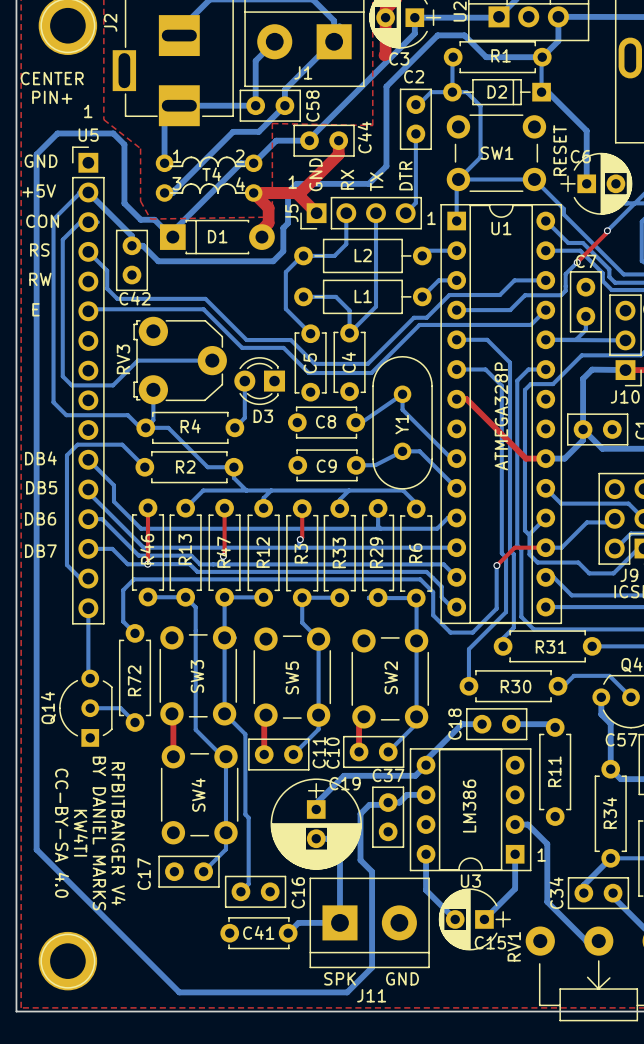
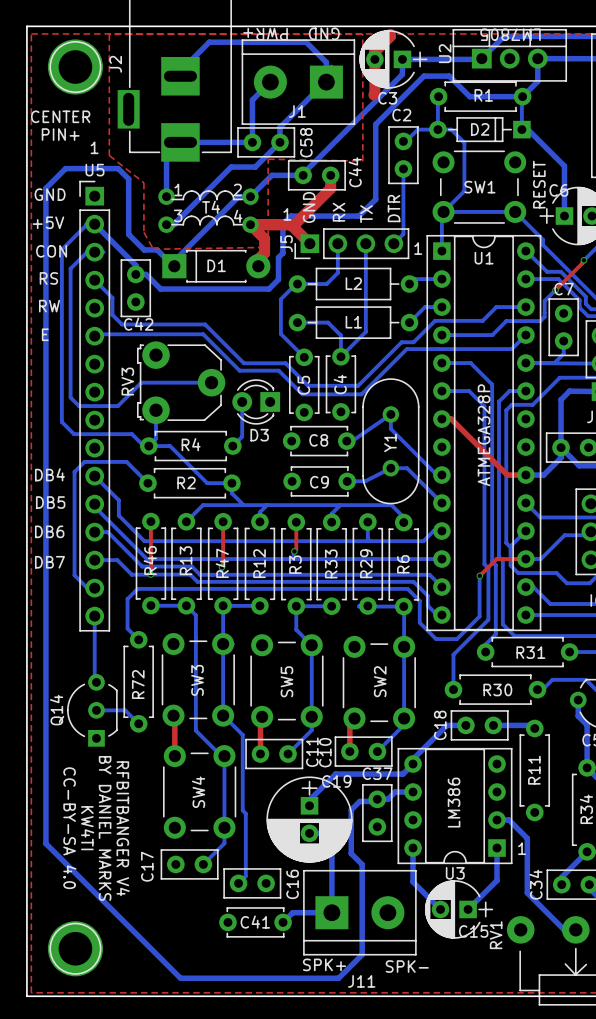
text: SPK (340, 978) -> SPK+ (324, 964)
text: GND (402, 978) -> none
text: none -> SPK- (407, 966)

